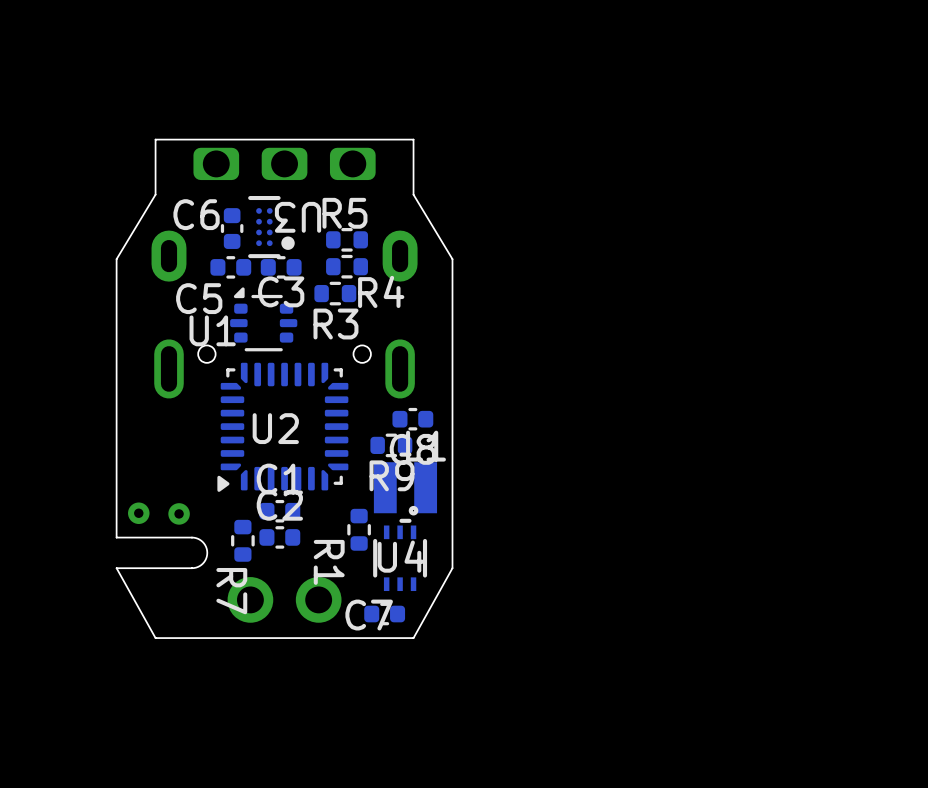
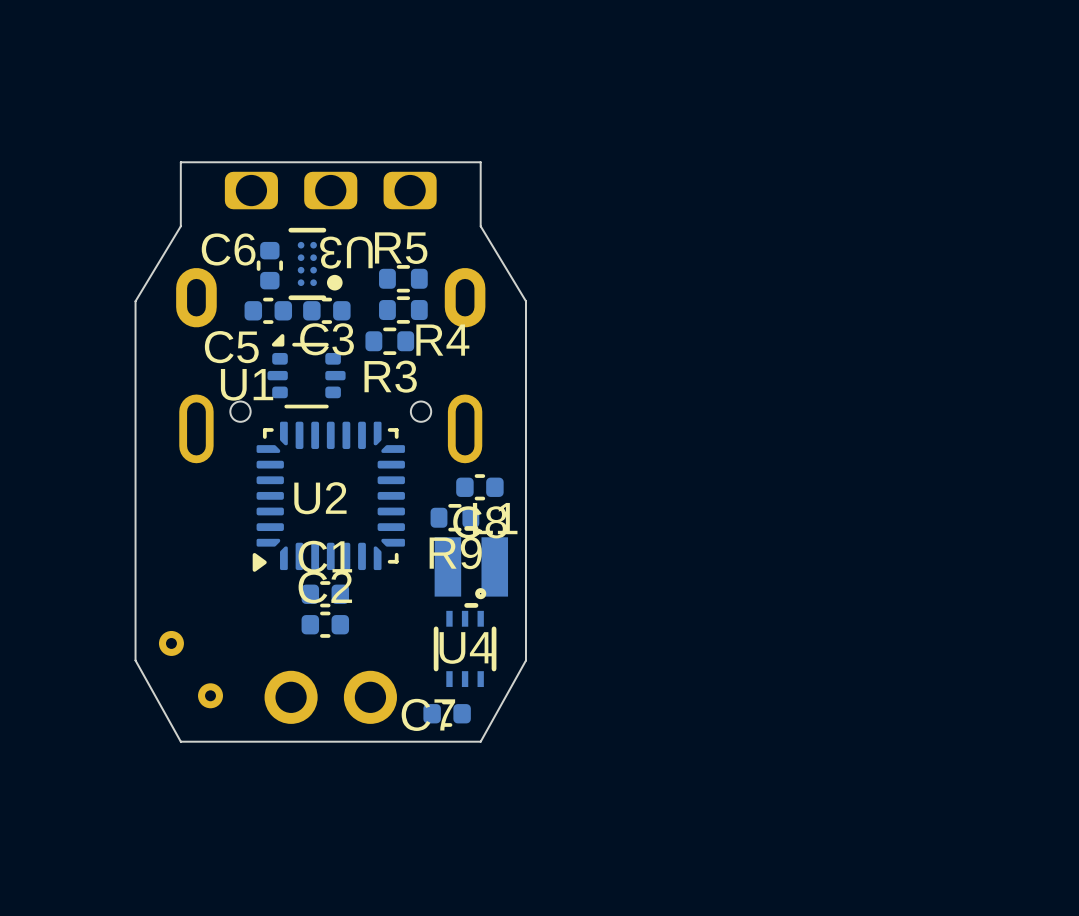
part: (138, 513) -> none
part: (179, 513) -> none
R1: (359, 529) -> none
board edge: (116, 537) (193, 537) (204, 543) (207, 552) (204, 562) (193, 568) (116, 568) -> (135, 624) (135, 660)
R7: (242, 540) -> none
part: none -> (171, 643)
part: none -> (210, 695)

